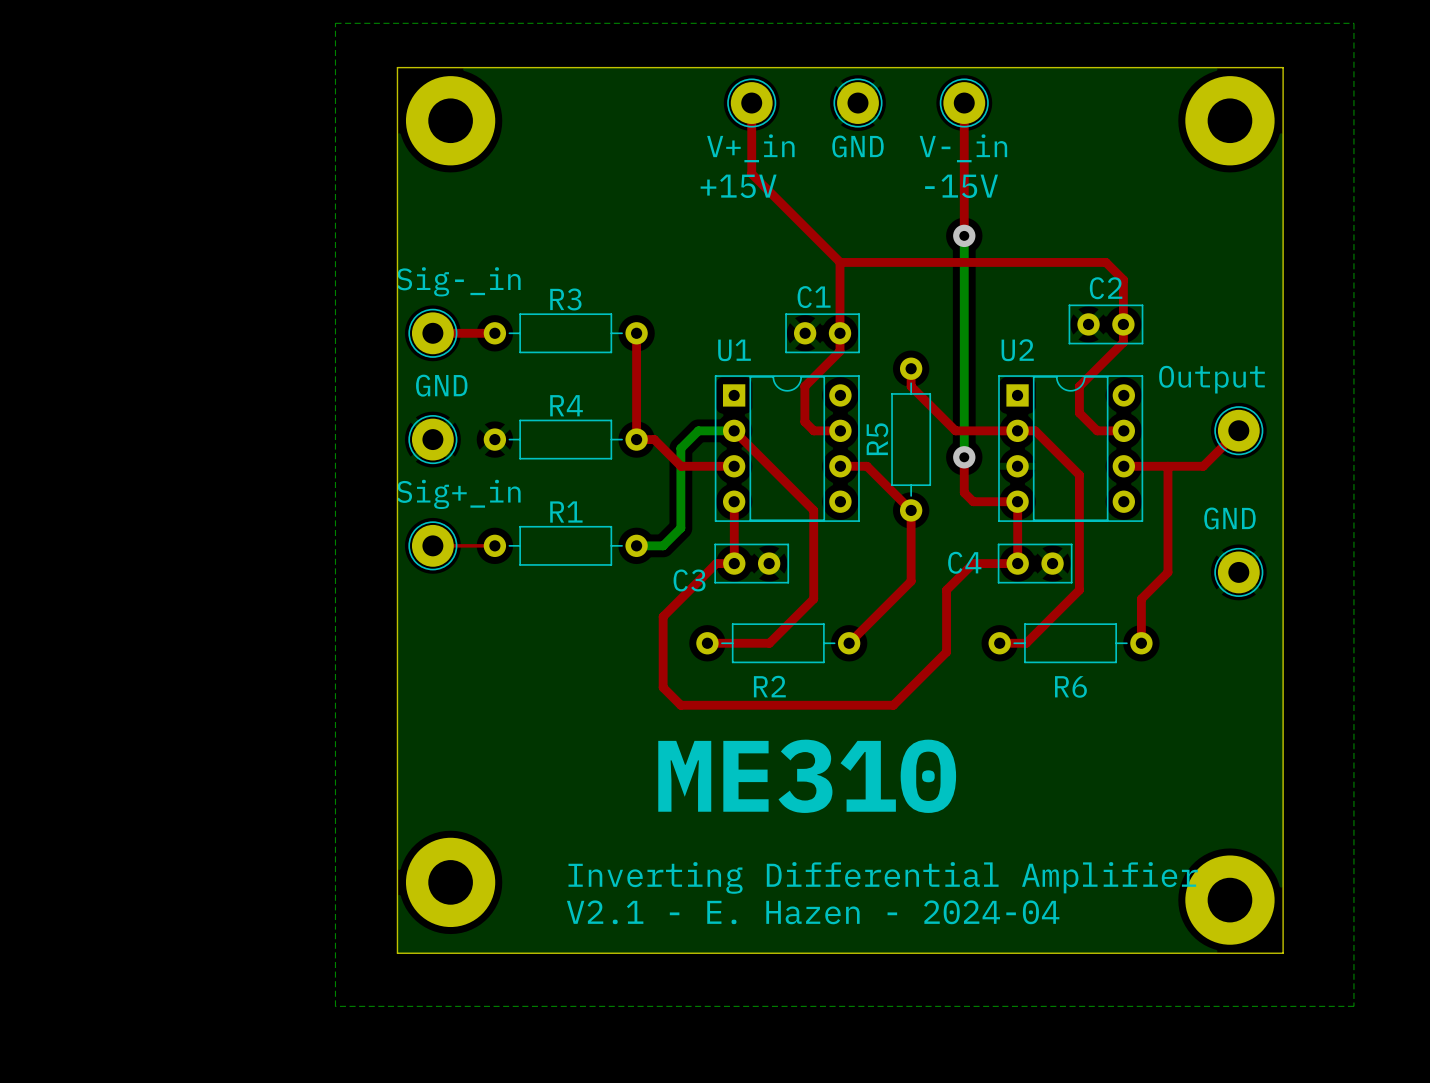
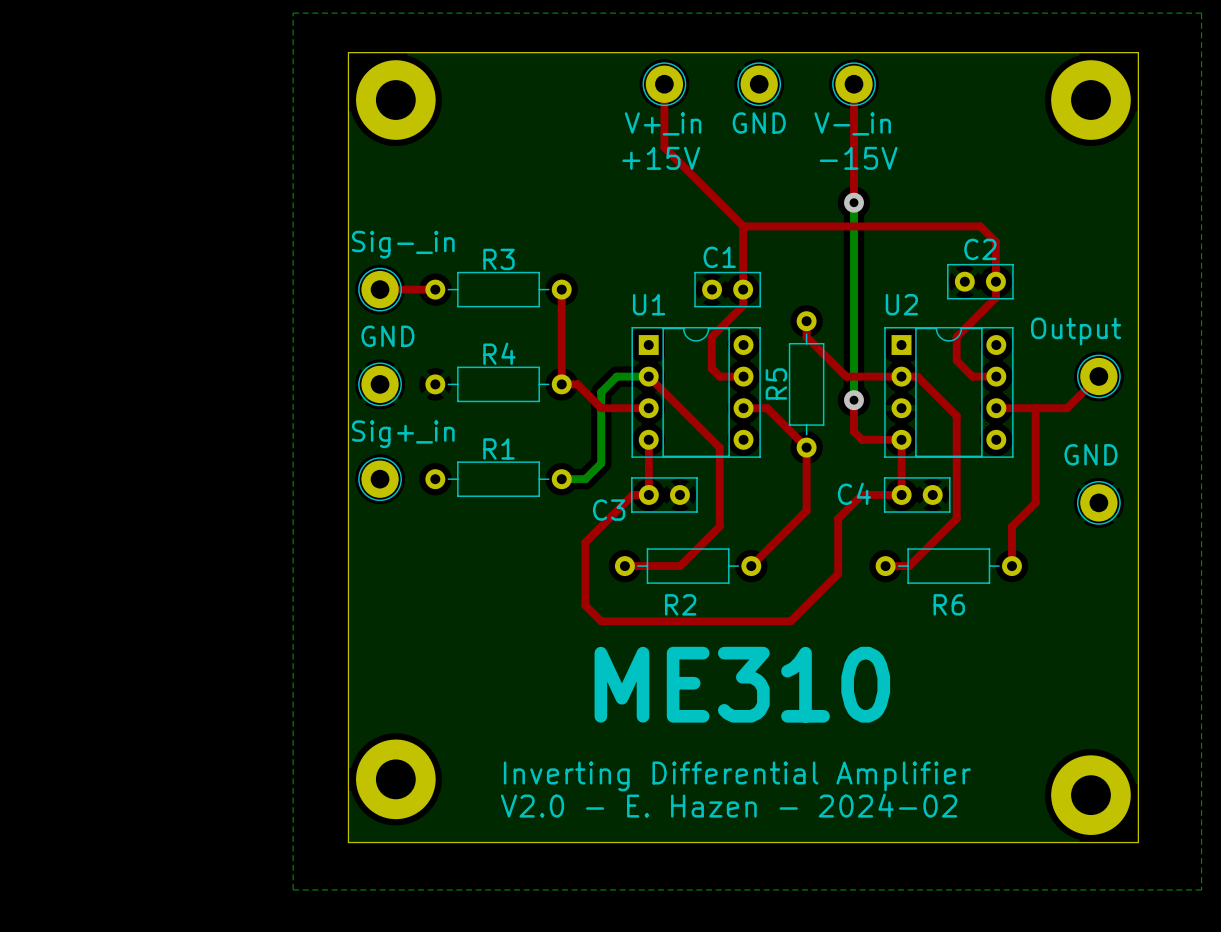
top track: (432, 545) (494, 545) -> none
text: V2.1 - E. Hazen - 2024-04 (813, 912) -> V2.0 - E. Hazen - 2024-02 (729, 805)

